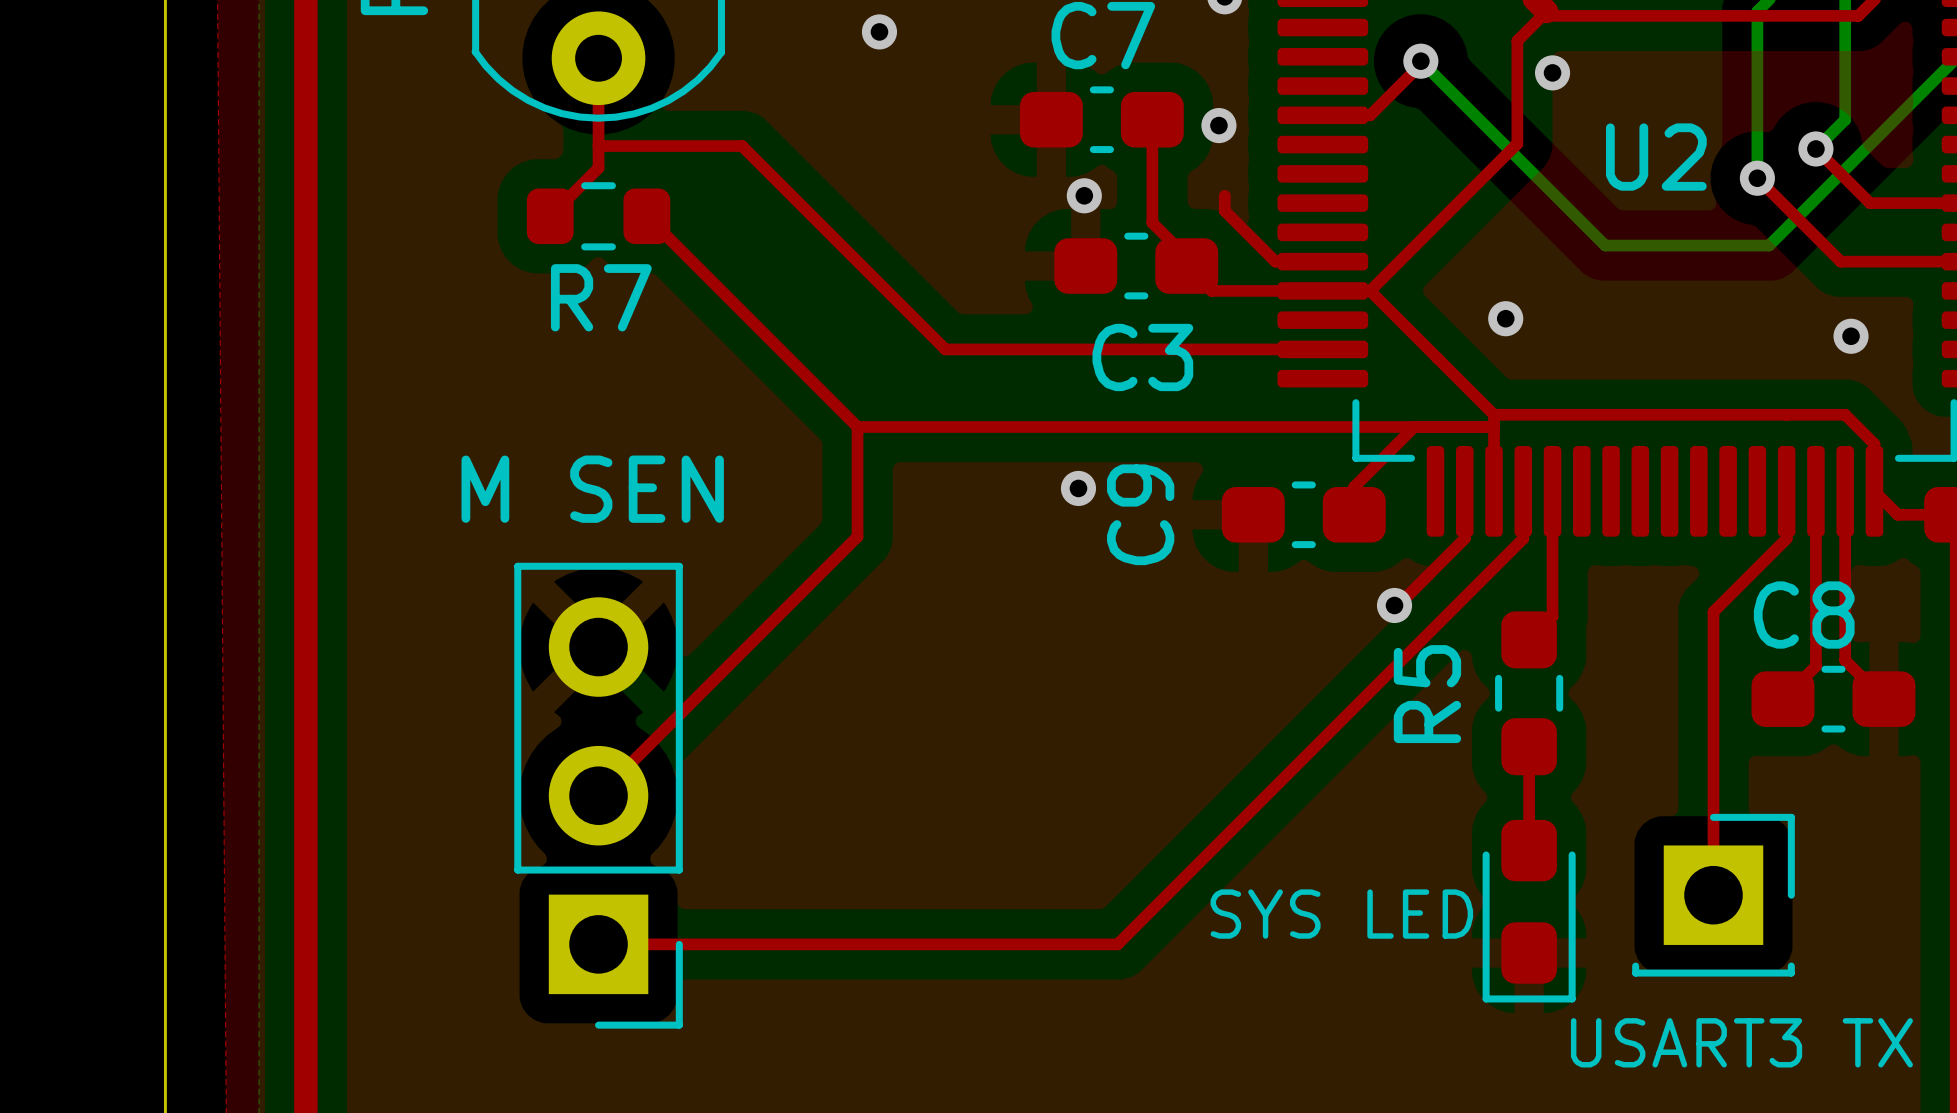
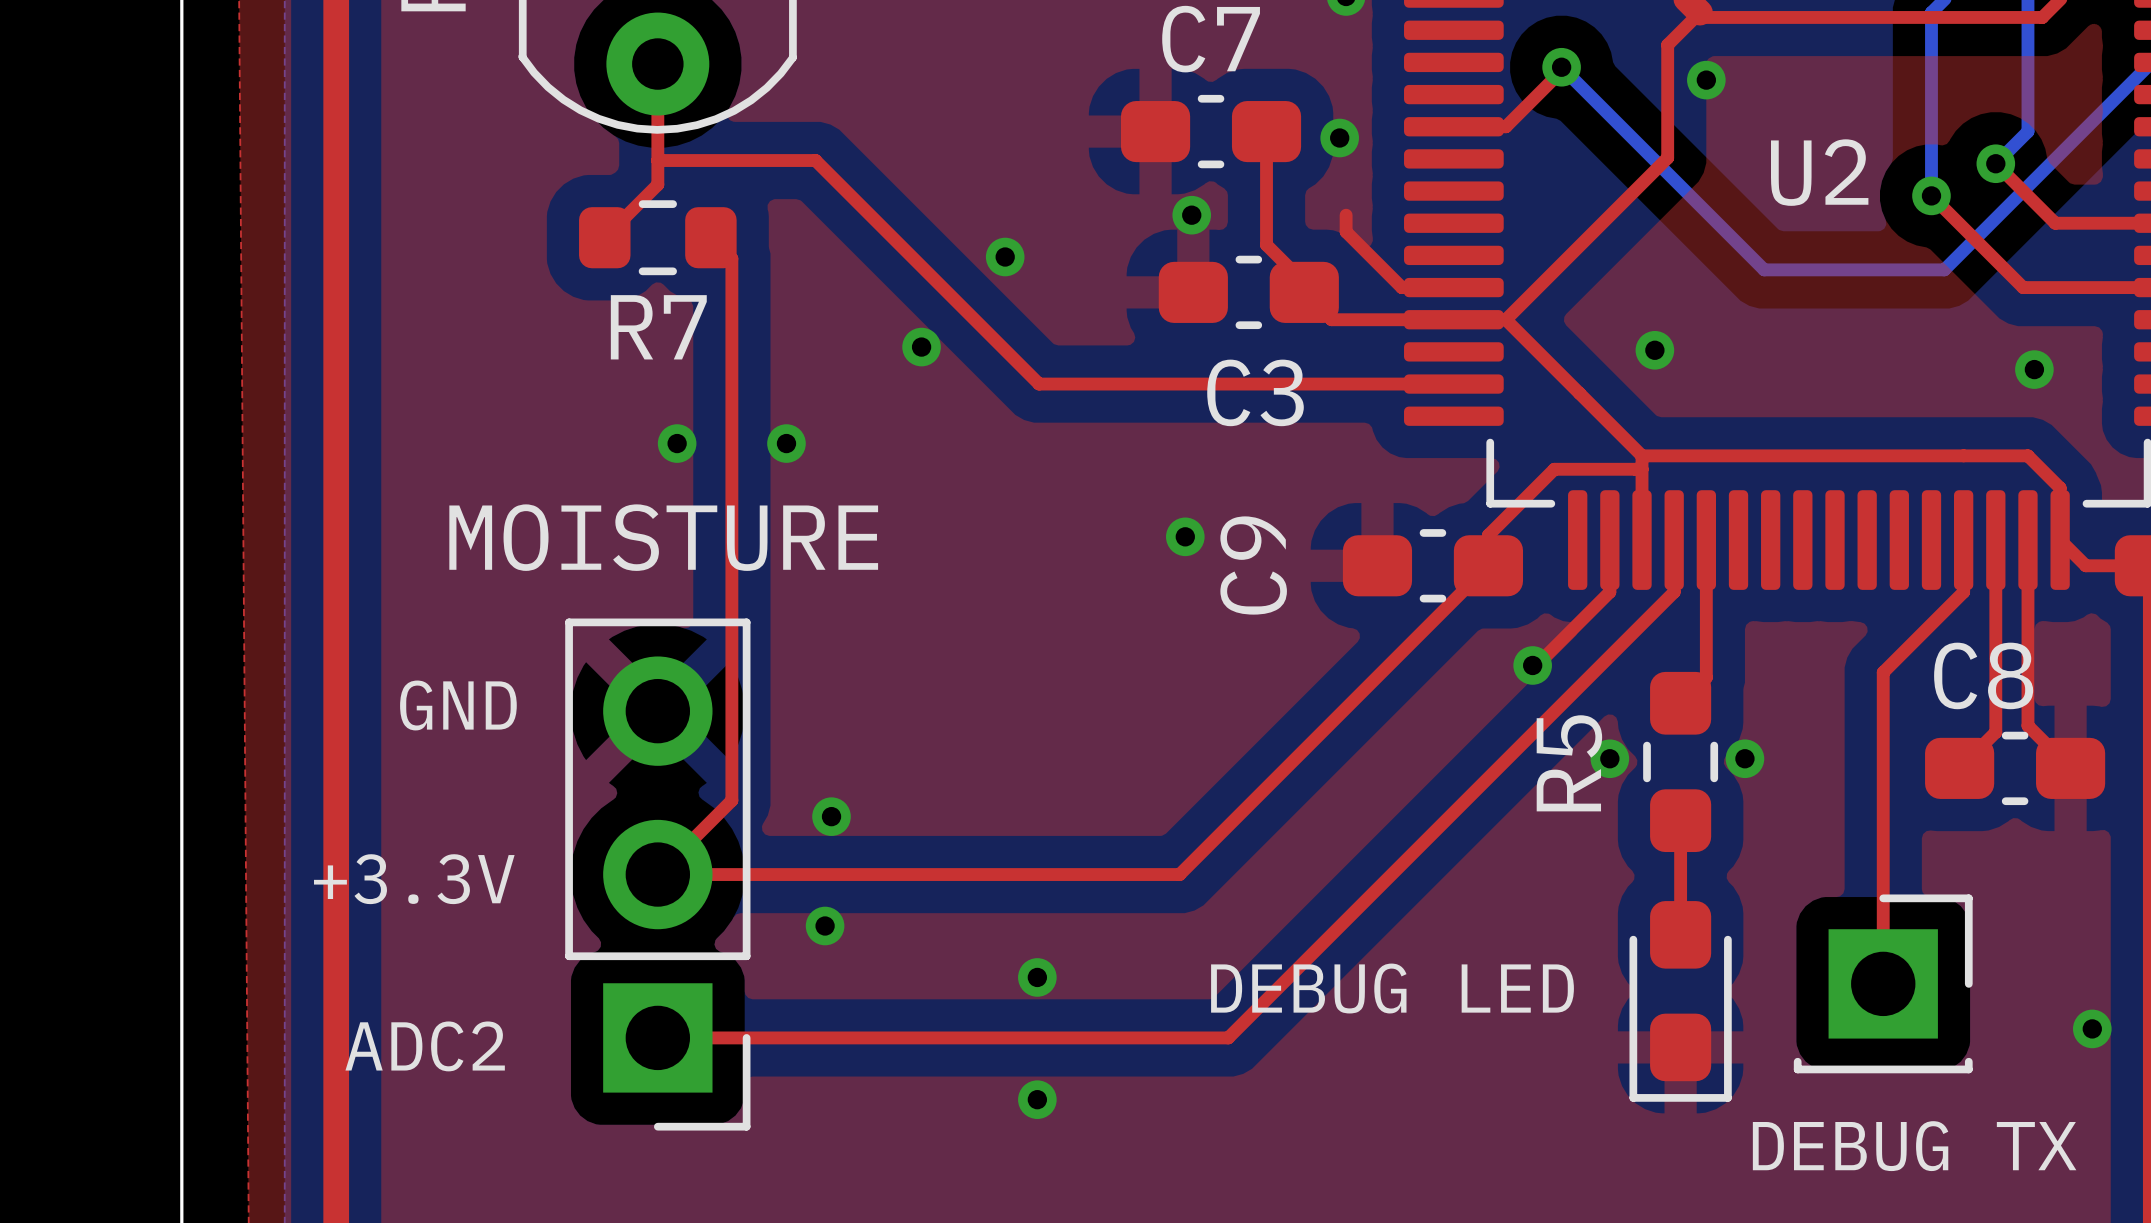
via: (879, 31) -> none
via: none -> (1005, 257)
top track: (665, 235) (857, 426) -> none
via: none -> (921, 347)
via: none -> (677, 443)
via: none -> (786, 443)
top track: (857, 426) (857, 536) (665, 728) -> (731, 258) (731, 800)
top track: (857, 426) (1414, 426) -> none
part value: M SEN (592, 489) -> MOISTURE (663, 537)
top track: none -> (1488, 565) (1179, 874) (657, 874)
text: none -> GND (458, 705)
via: none -> (1609, 758)
via: none -> (1744, 758)
via: none -> (831, 816)
text: none -> +3.3V (414, 879)
via: none -> (825, 926)
via: none -> (1037, 977)
part value: SYS LED (1341, 914) -> DEBUG LED (1392, 988)
via: none -> (2092, 1028)
text: none -> ADC2 (425, 1046)
via: none -> (1037, 1099)
part value: USART3 TX (1741, 1042) -> DEBUG TX (1914, 1146)

